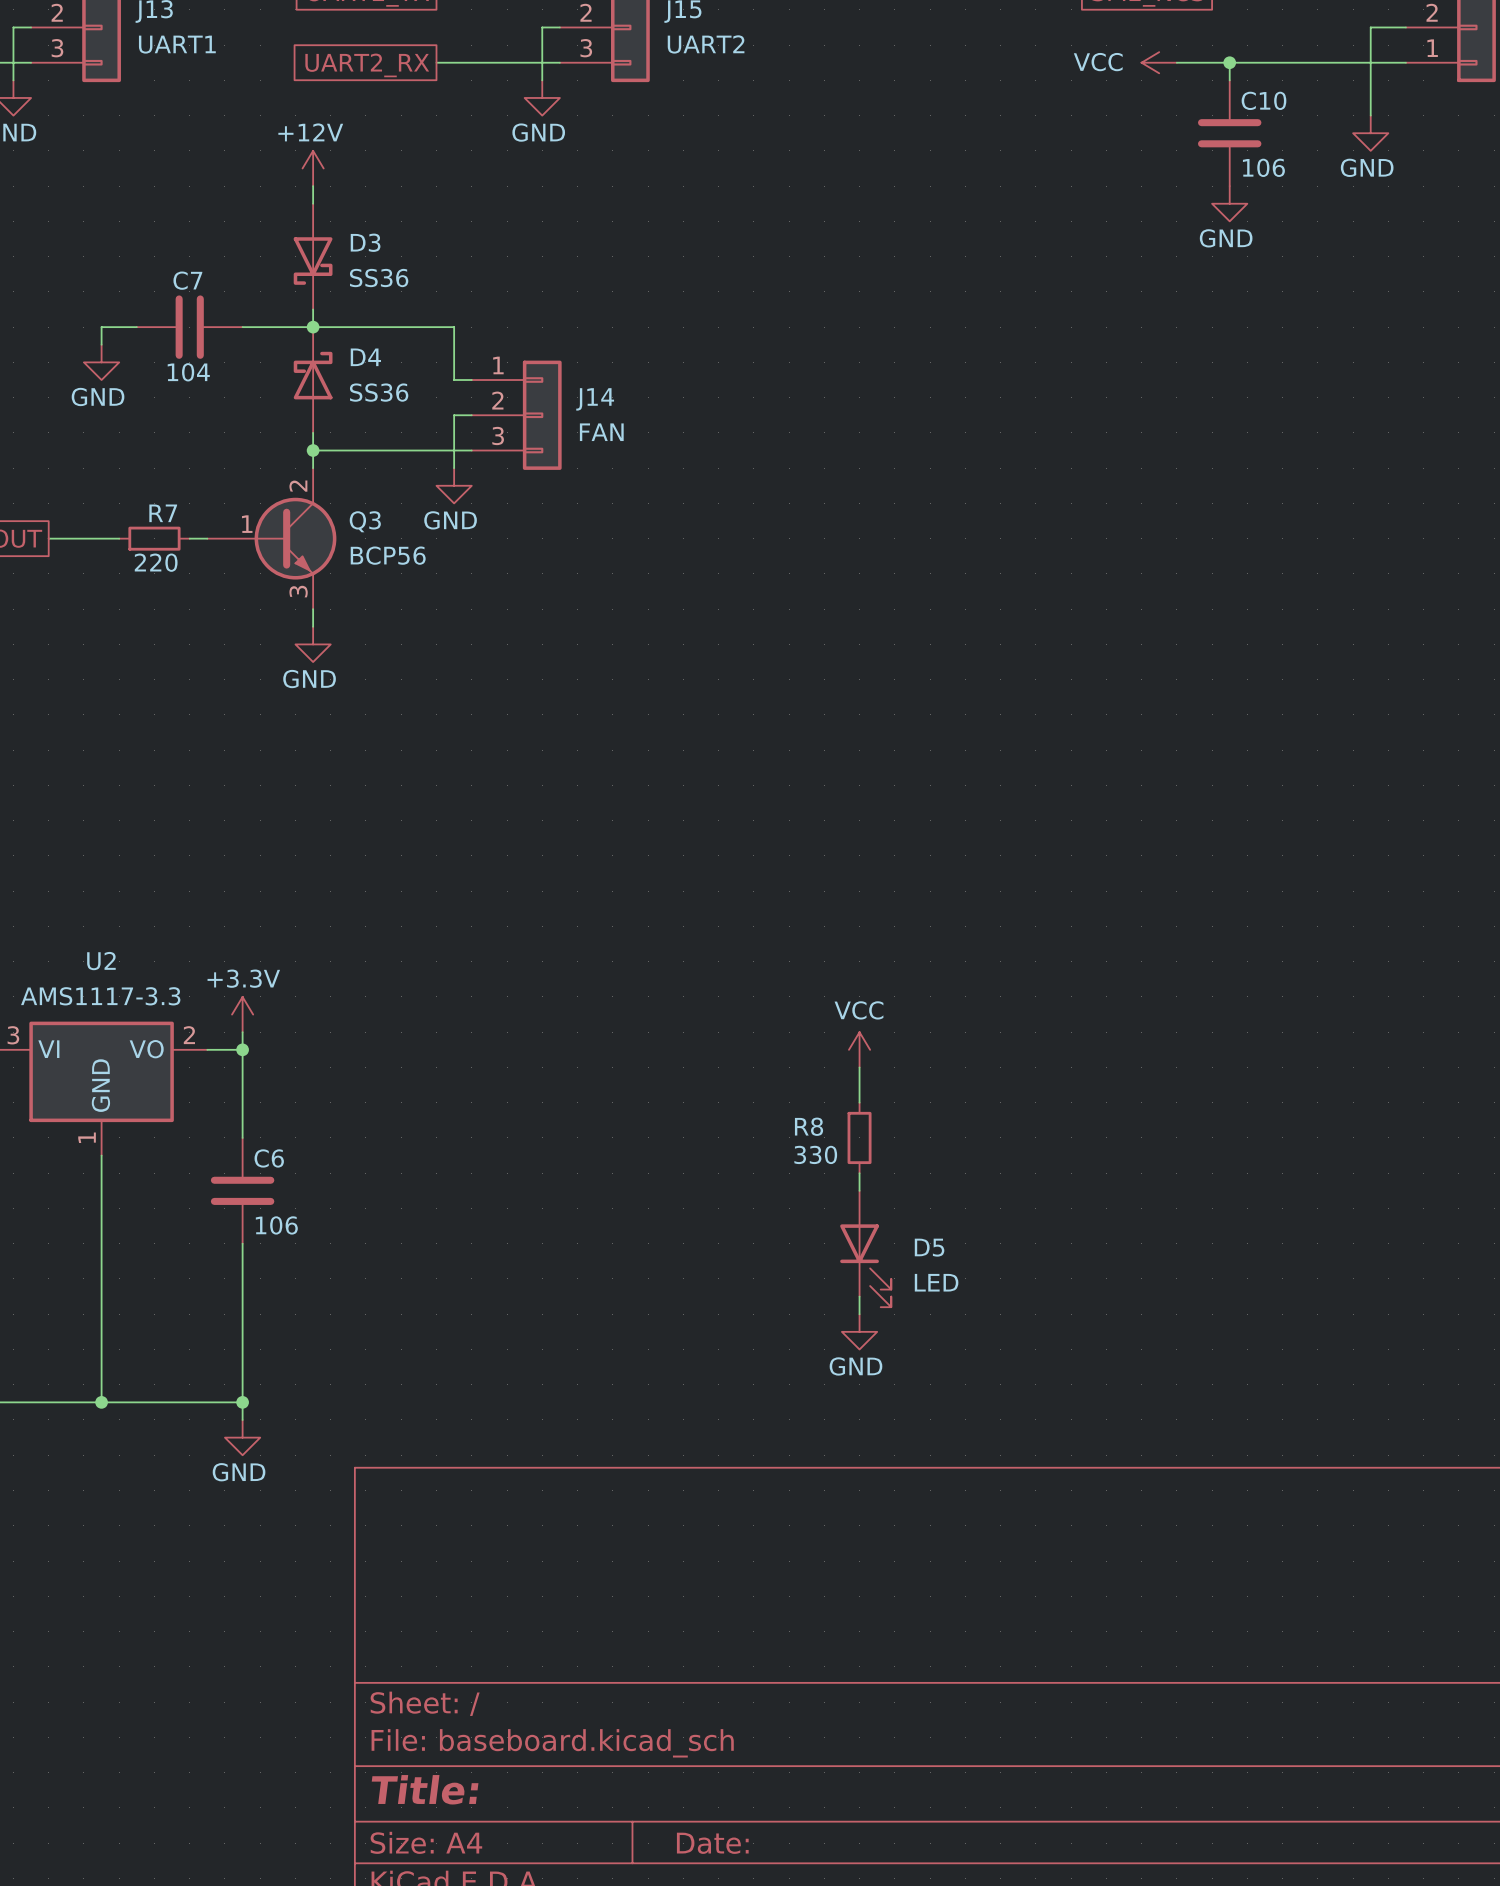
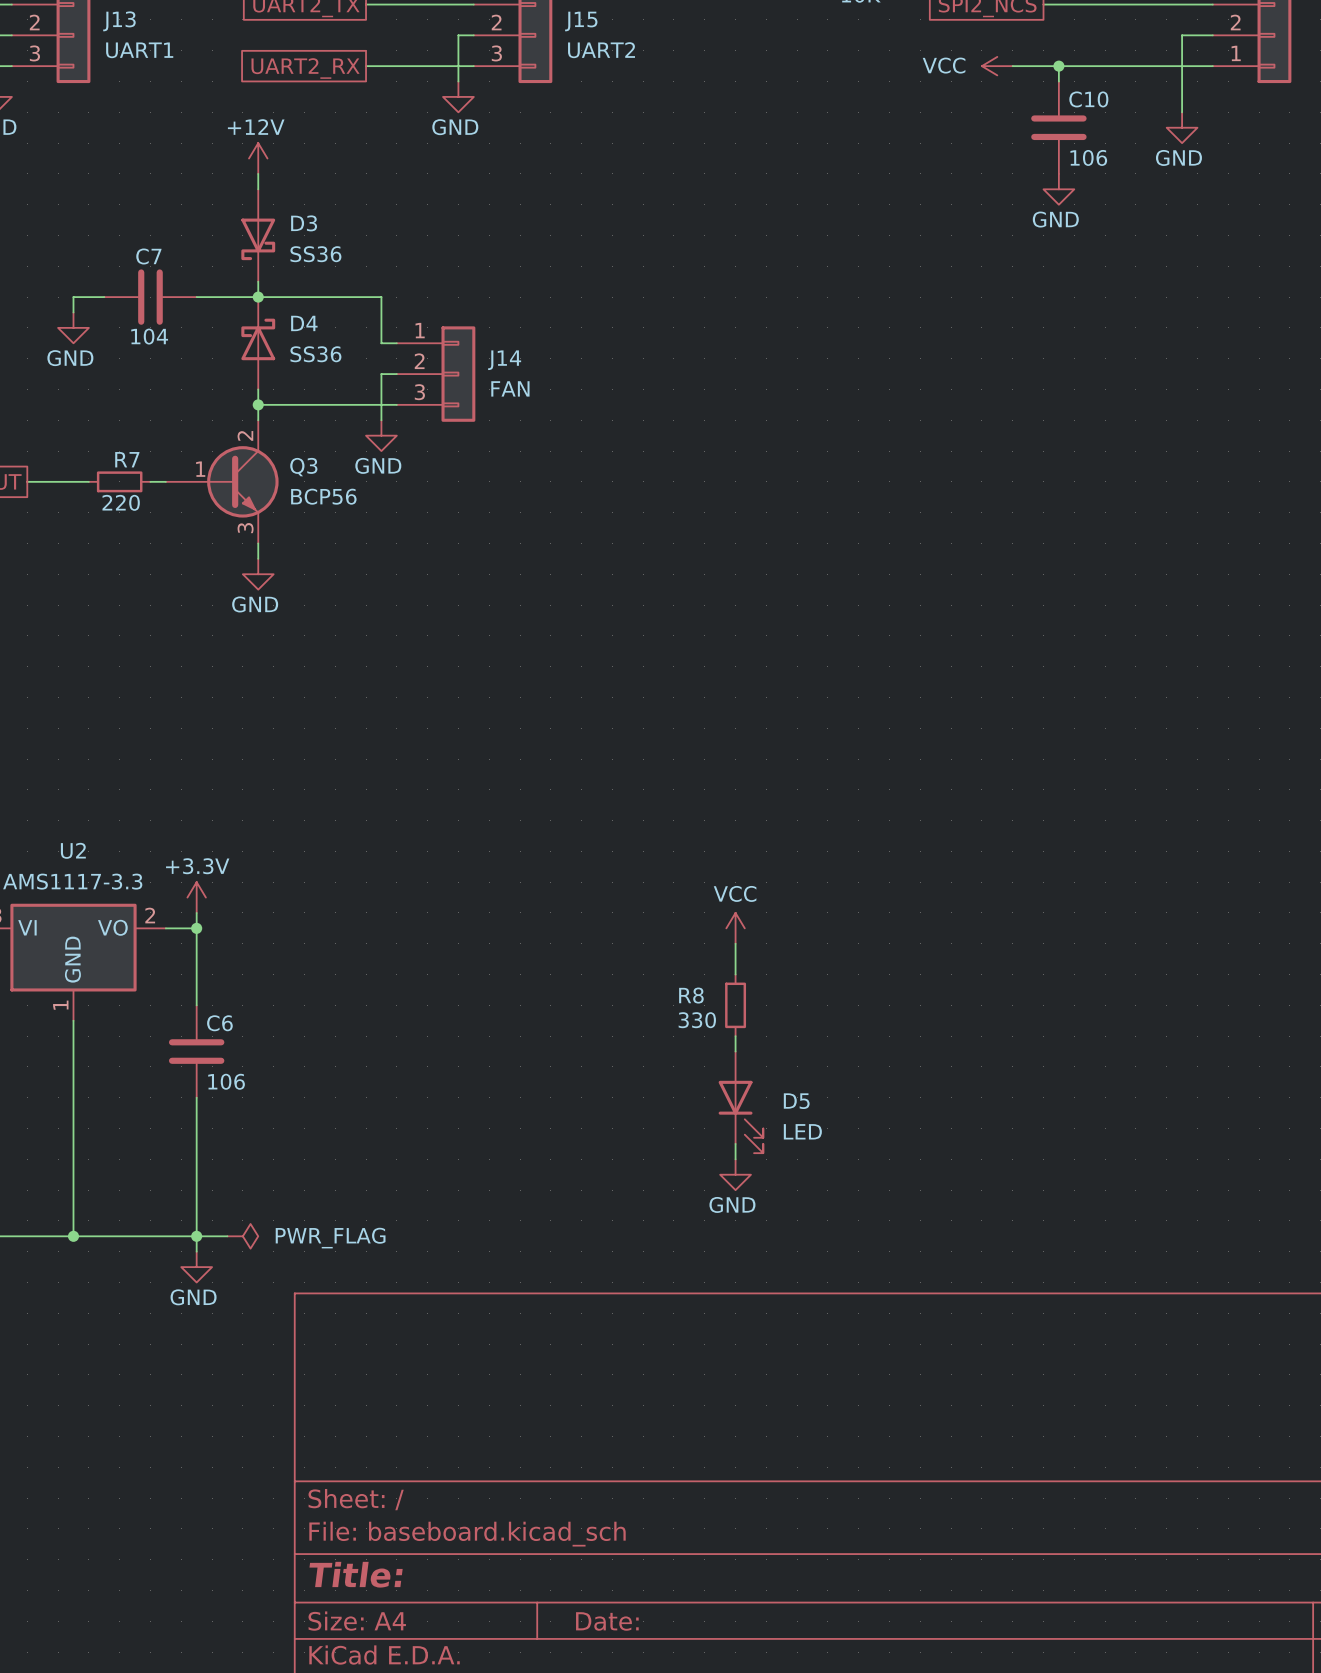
wire: none -> (196, 1236) (227, 1236)
power symbol: none -> PWR_FLAG (242, 1236)

